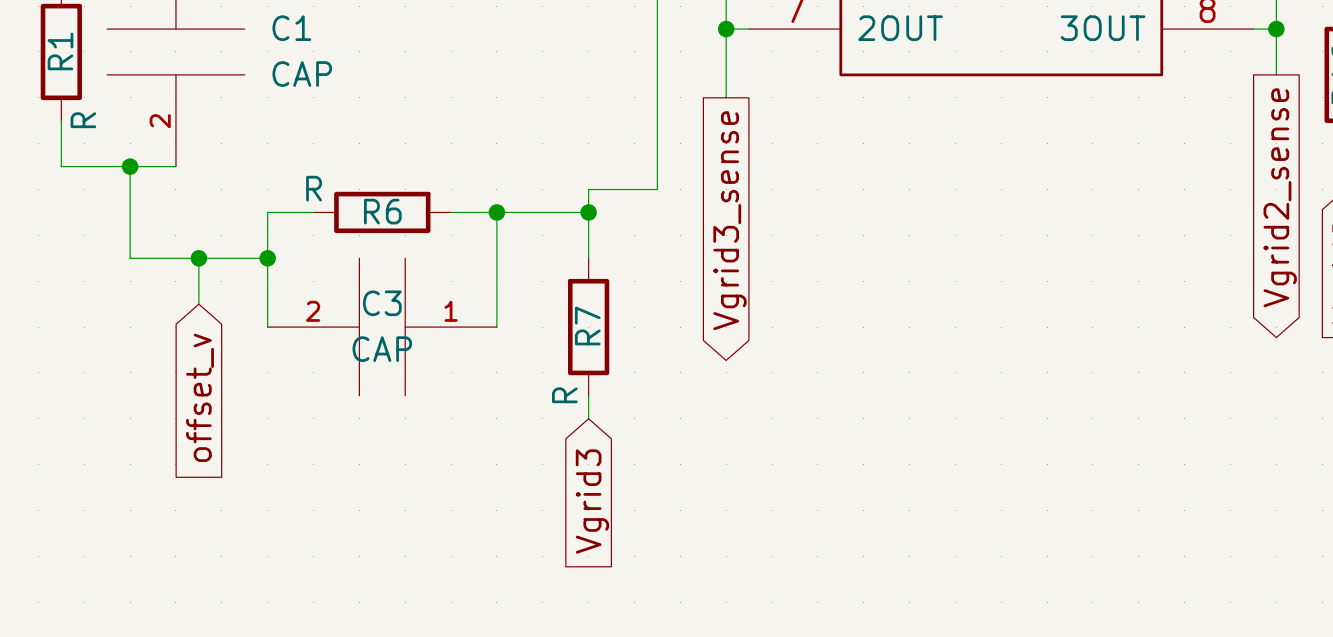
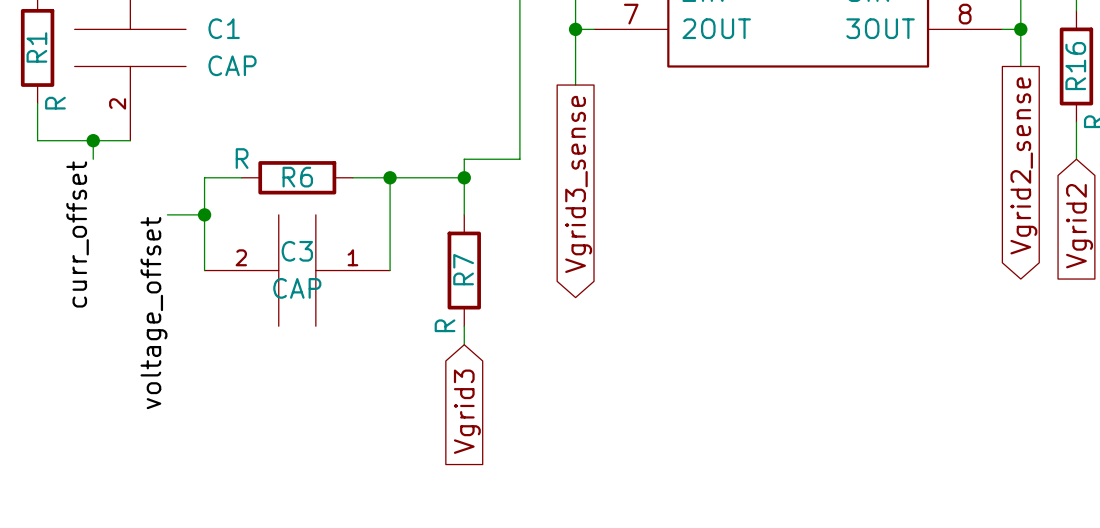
wire: (130, 189) (130, 258) (221, 258) -> none
wire: (198, 258) (198, 304) -> none
junction: (198, 258) -> none
label: none -> curr_offset (77, 234)
label: none -> voltage_offset (153, 313)
global label: offset_v (199, 397) -> none

